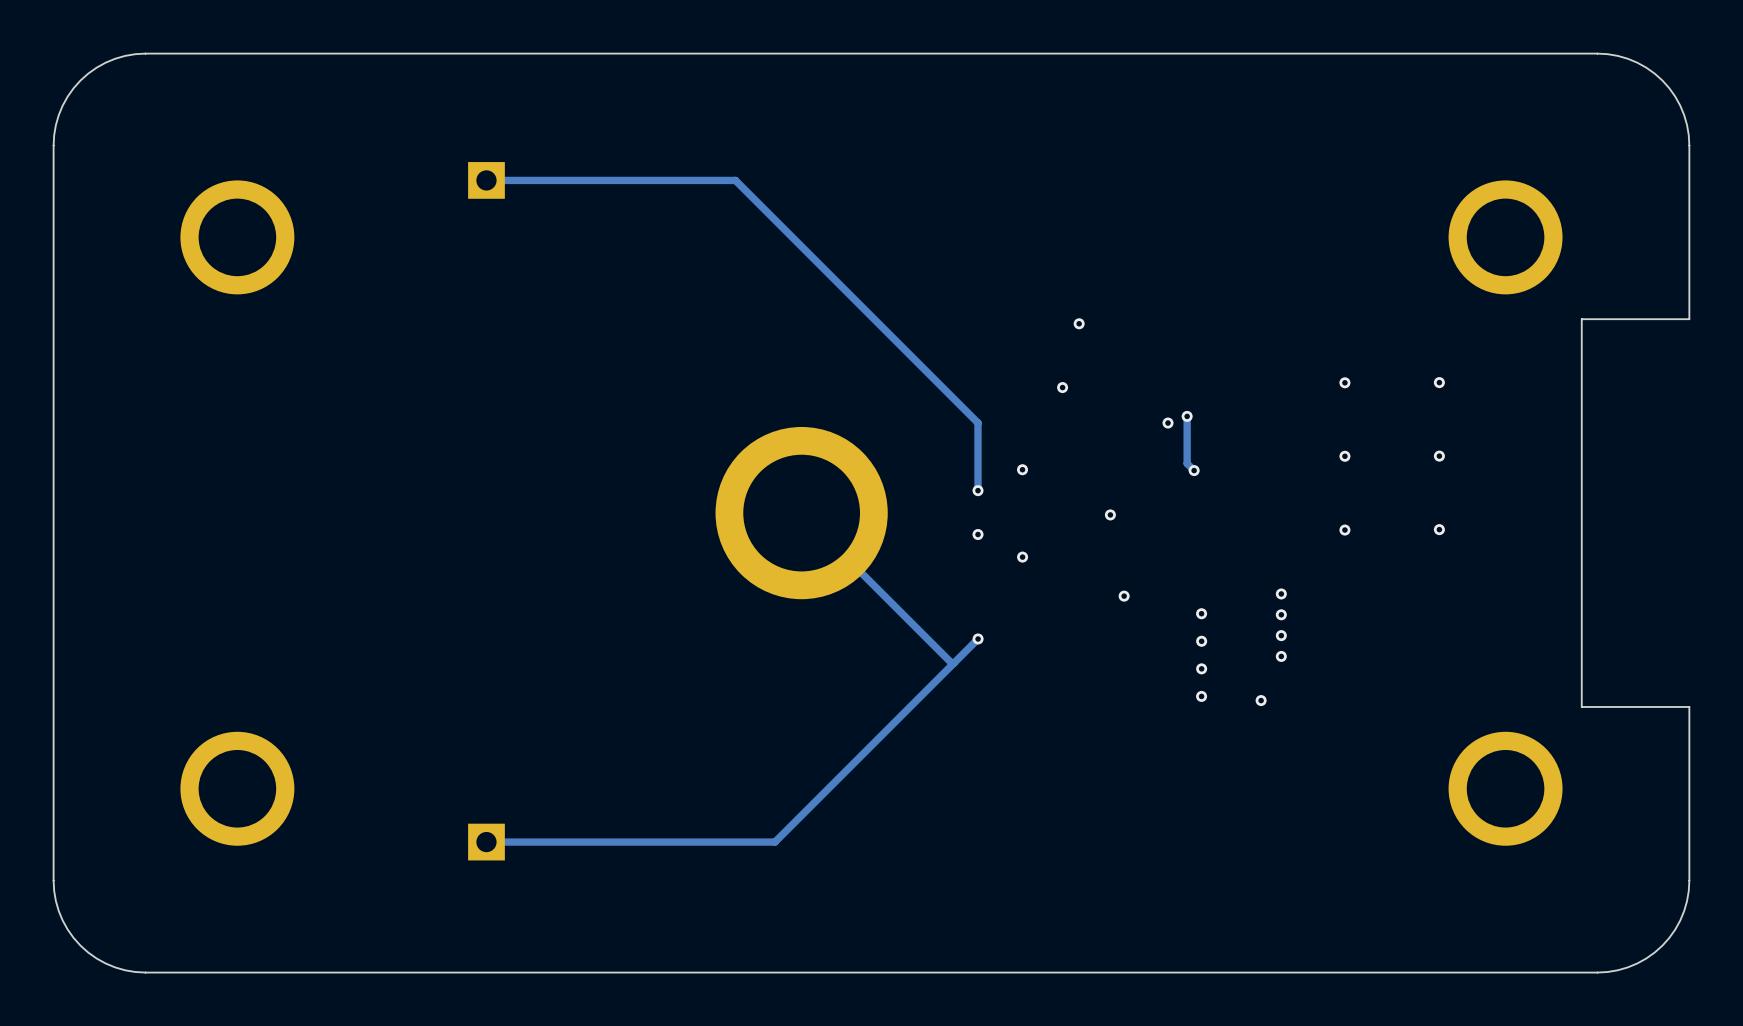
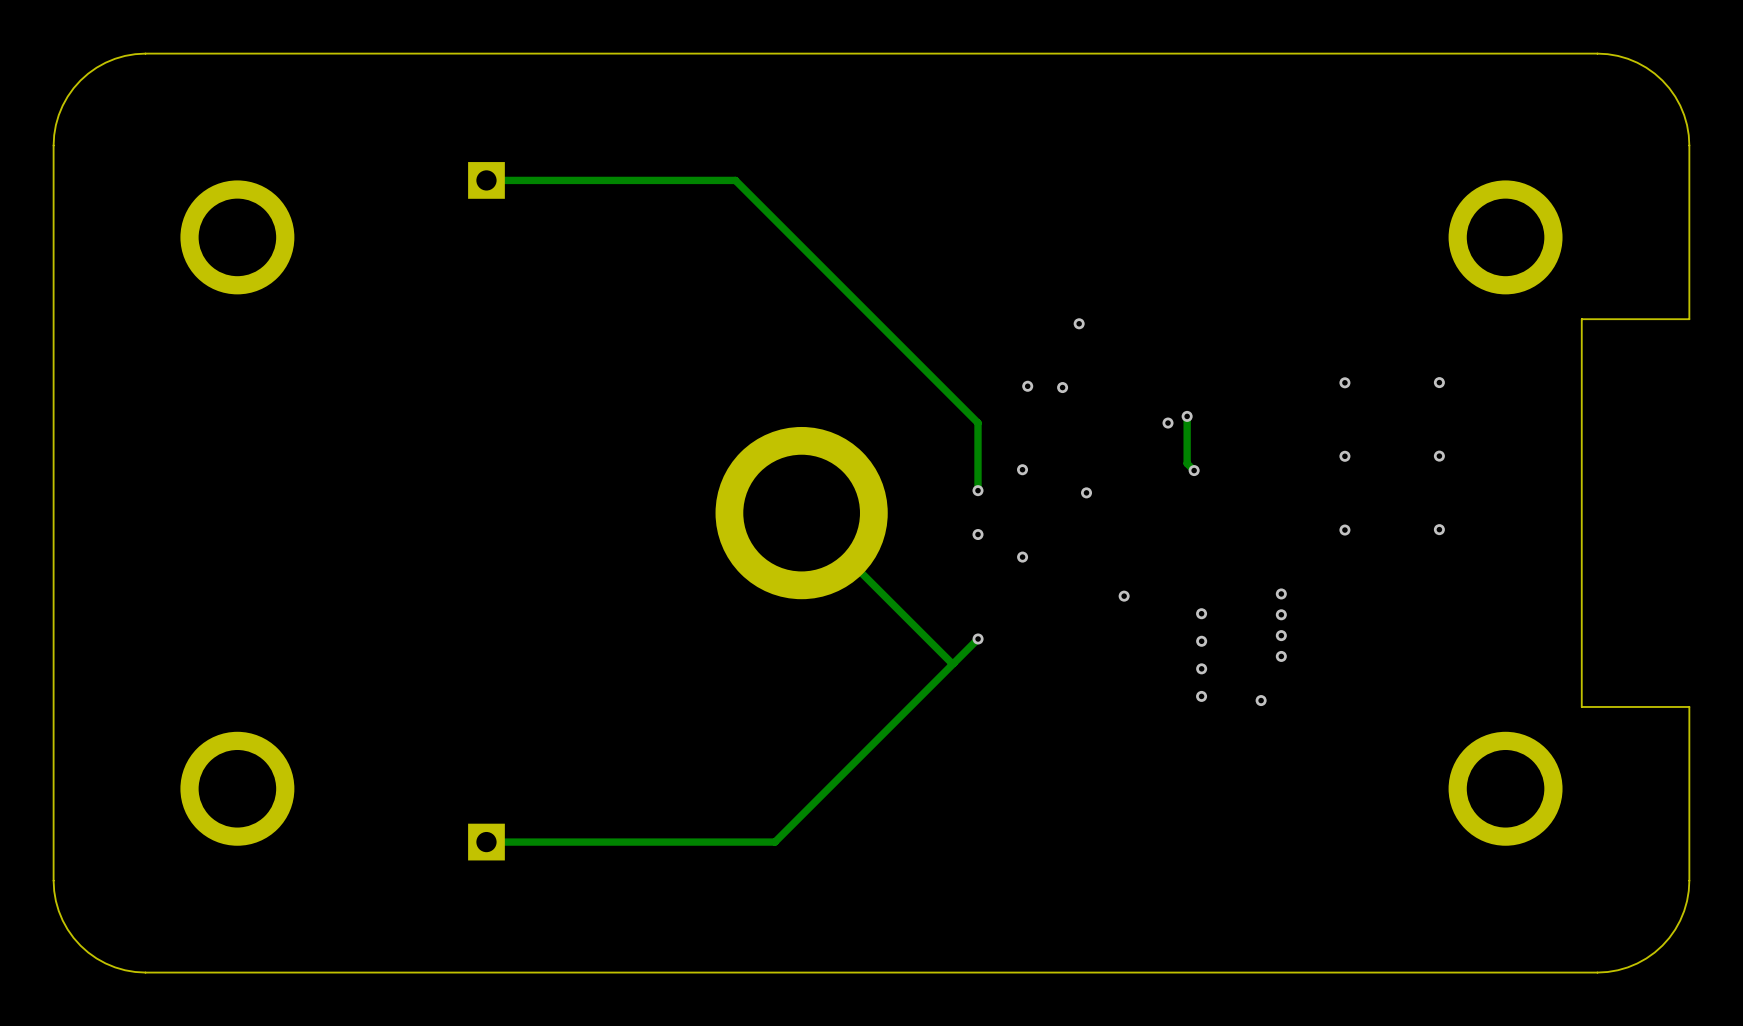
via: none -> (1027, 386)
via position: (1110, 514) -> (1086, 492)

